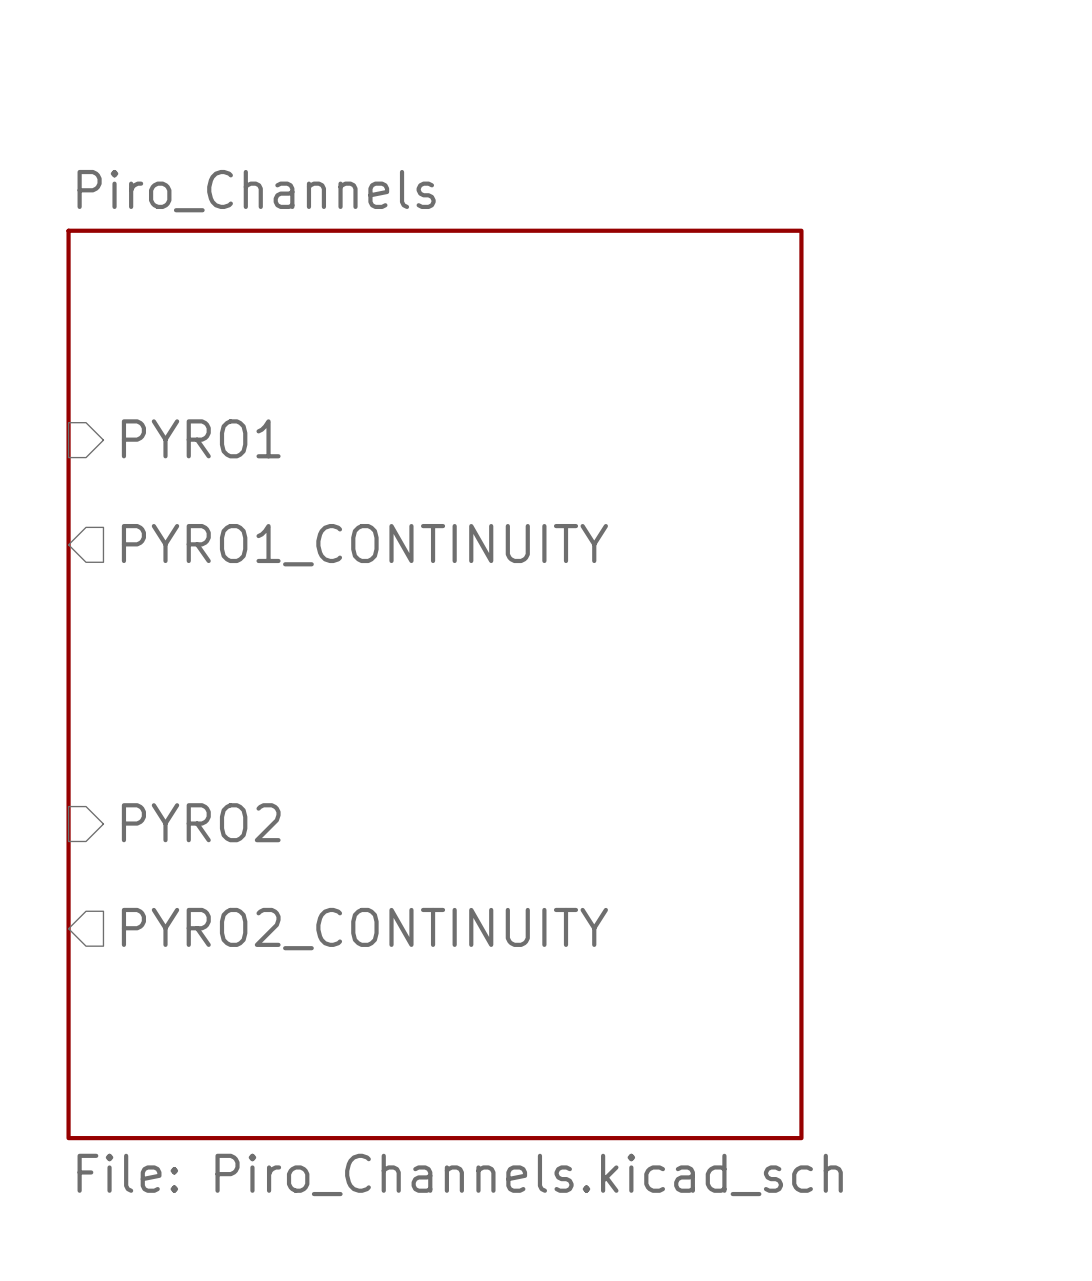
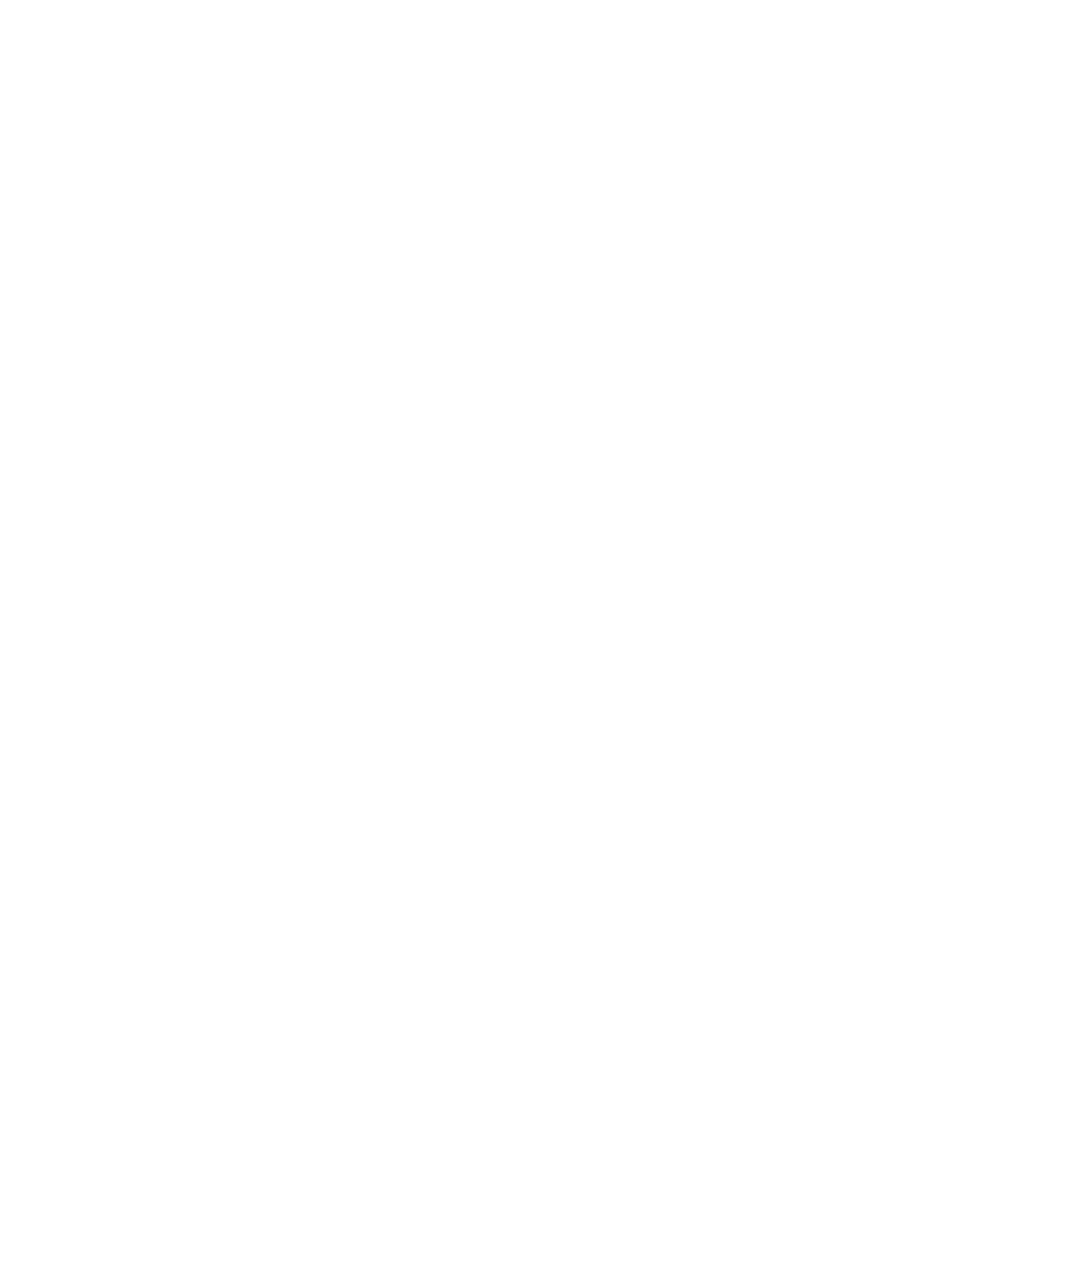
sheet pin: PYRO1 (201, 438) -> none
sheet pin: PYRO1_CONTINUITY (364, 545) -> none
sheet Piro_Channels: File: Piro_Channels.kicad_sch (435, 684) -> none
sheet pin: PYRO2 (201, 822) -> none
sheet pin: PYRO2_CONTINUITY (364, 929) -> none

